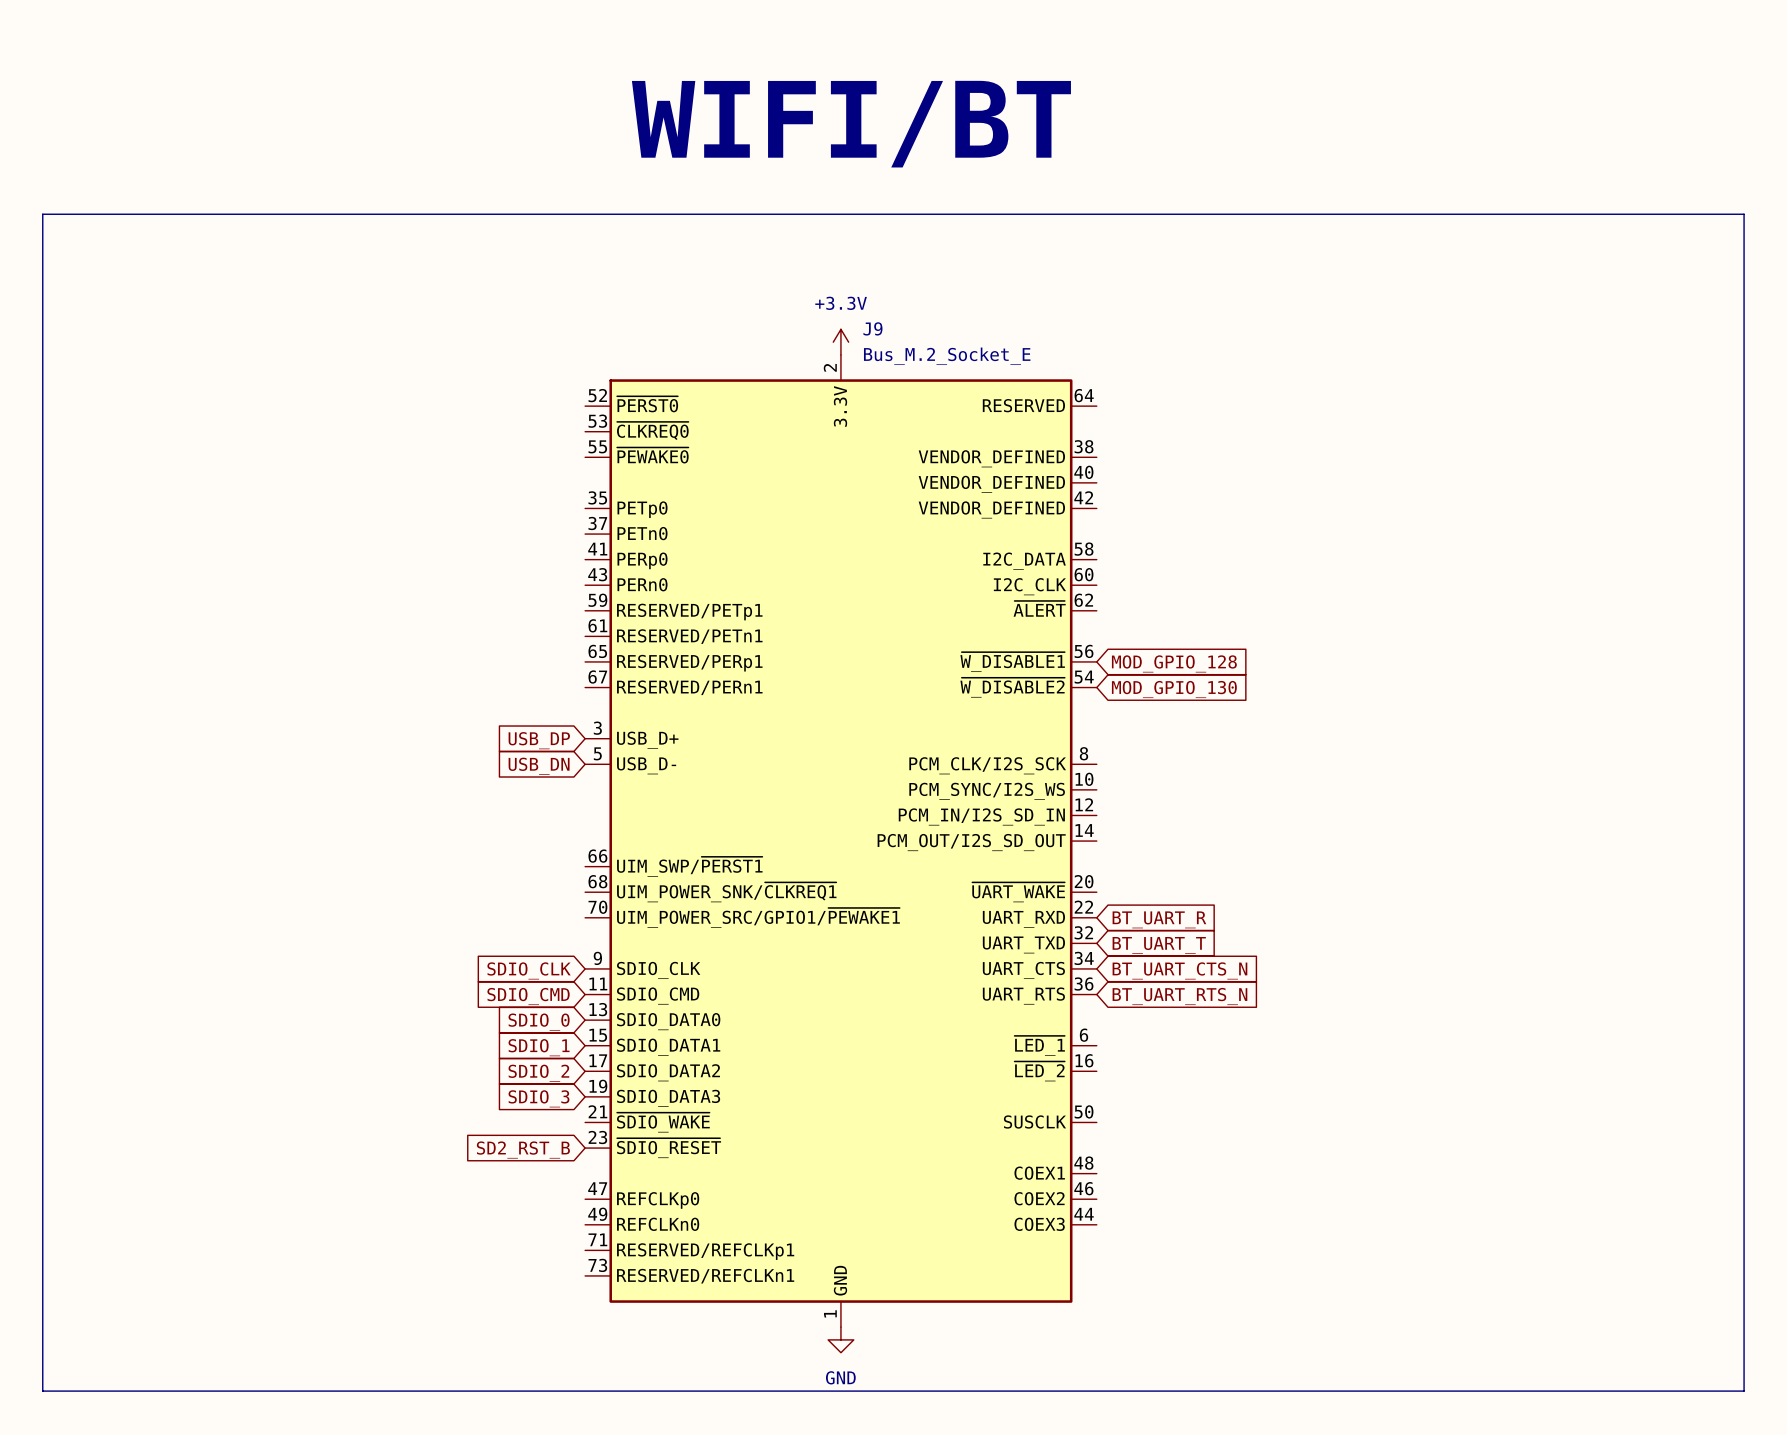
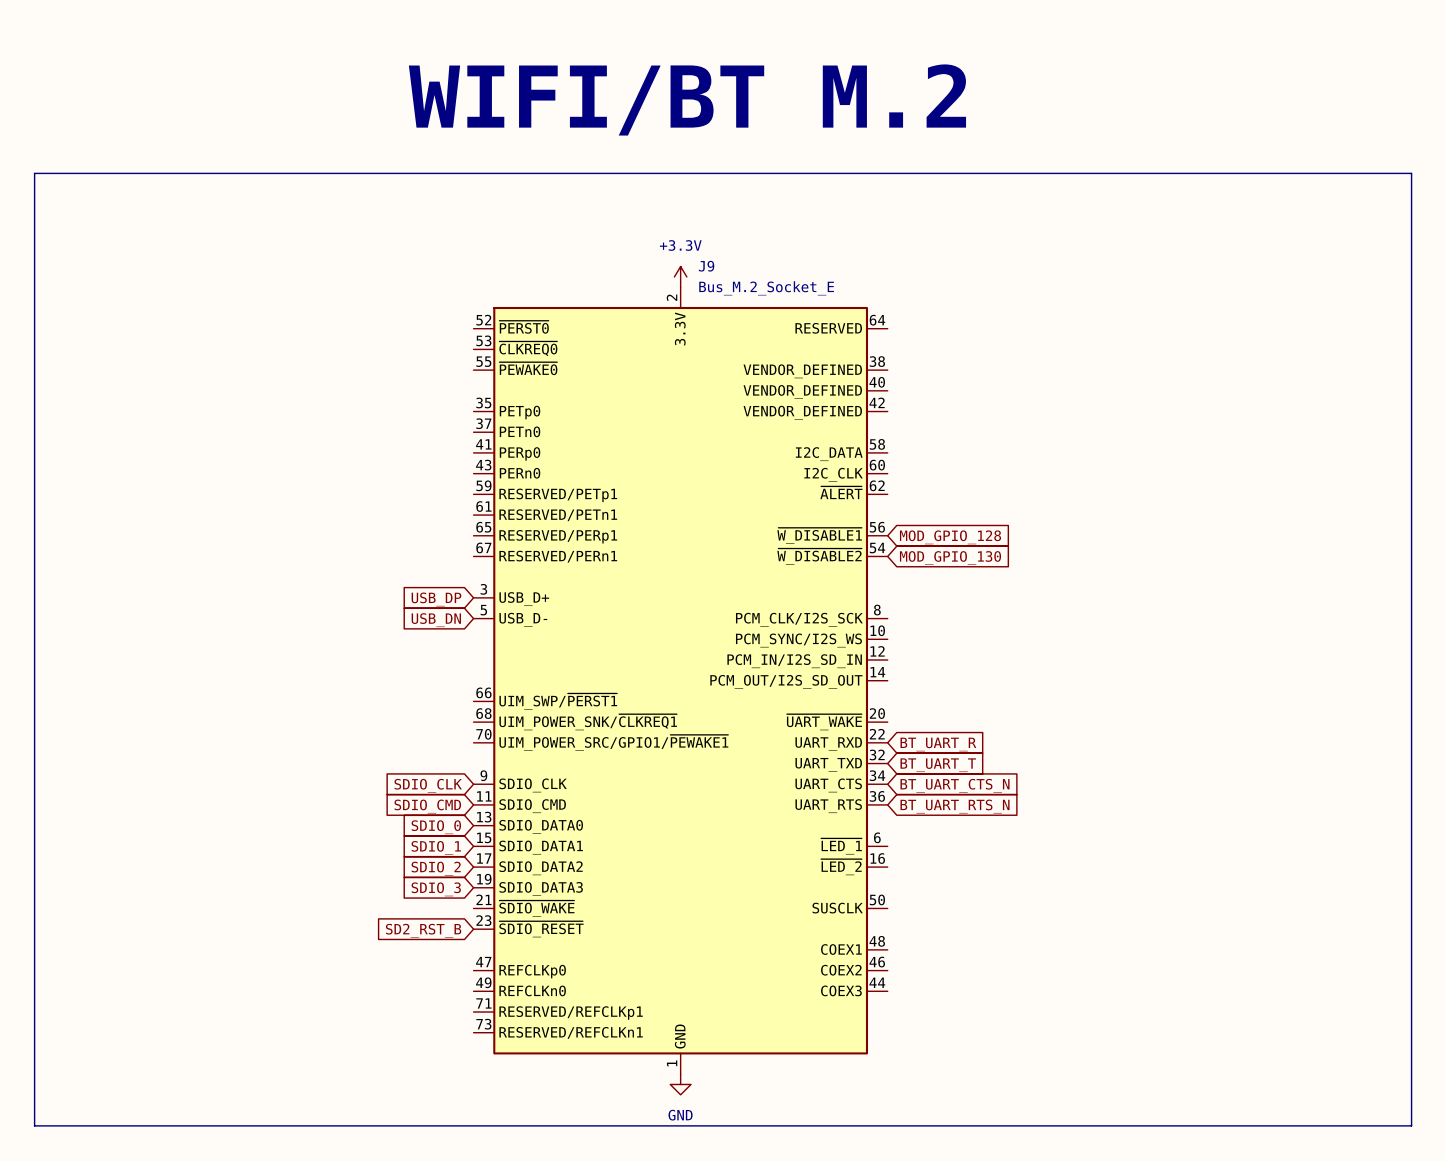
text: WIFI/BT (851, 124) -> WIFI/BT M.2 (687, 99)

